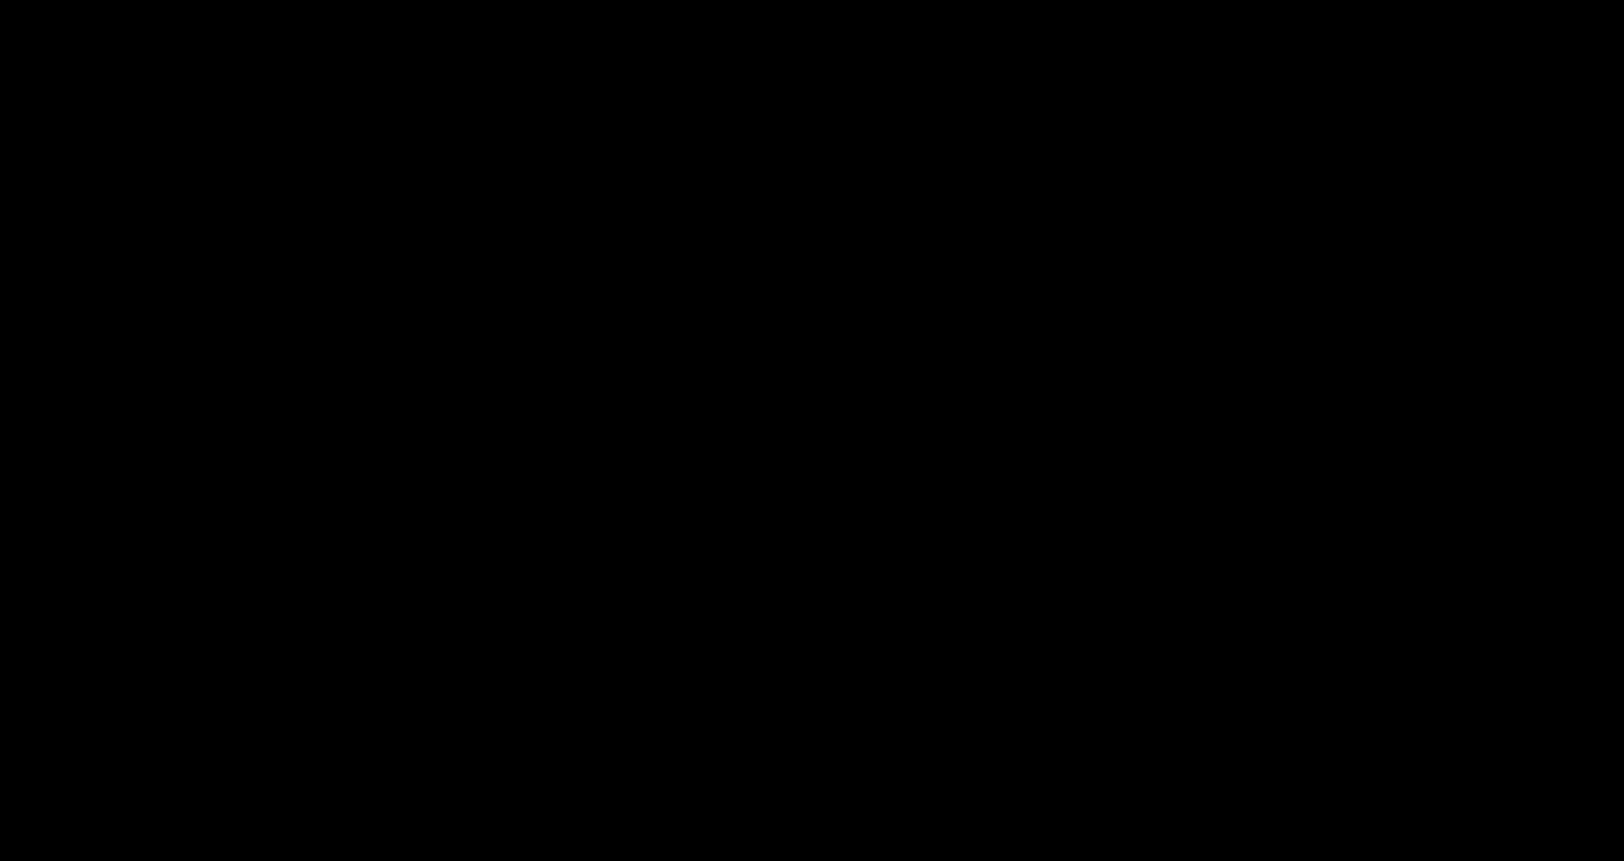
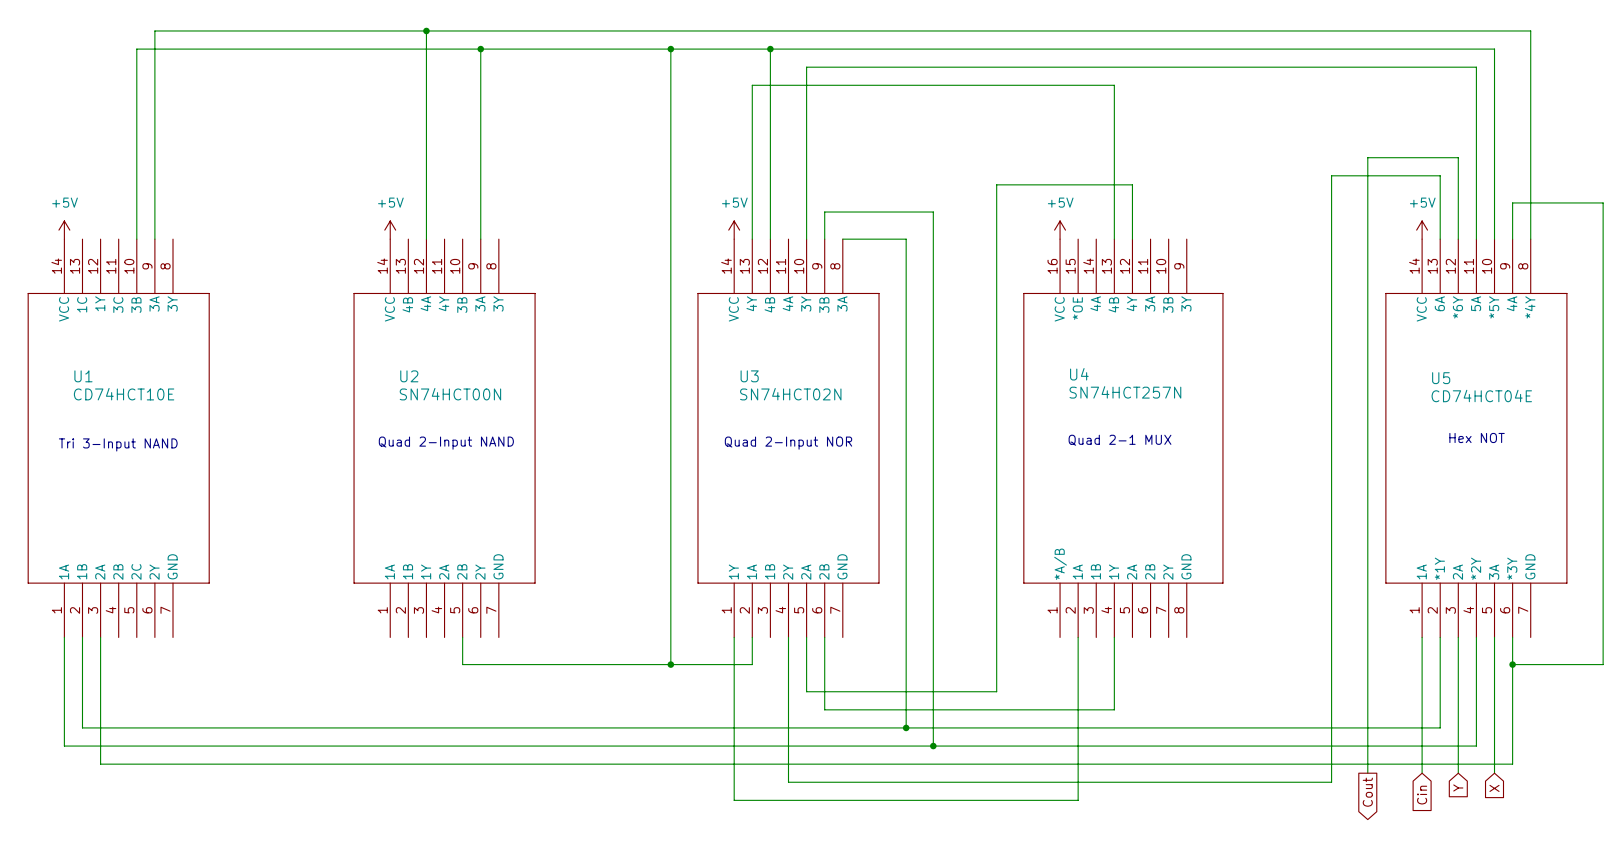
wire: none -> (426, 30) (426, 239)
junction: none -> (426, 30)
wire: none -> (480, 49) (480, 239)
junction: none -> (480, 49)
wire: none -> (670, 49) (670, 664)
junction: none -> (670, 49)
wire: none -> (770, 49) (770, 239)
junction: none -> (770, 49)
power symbol: none -> +5V (64, 230)
power symbol: none -> +5V (390, 230)
power symbol: none -> +5V (734, 230)
power symbol: none -> +5V (1060, 230)
power symbol: none -> +5V (1422, 230)
wire: none -> (136, 239) (136, 49) (1494, 49) (1494, 239)
wire: none -> (154, 239) (154, 30) (1530, 30) (1530, 239)
wire: none -> (752, 239) (752, 85) (1114, 85) (1114, 239)
wire: none -> (806, 239) (806, 67) (1476, 67) (1476, 239)
wire: none -> (824, 239) (824, 212) (933, 212) (933, 746)
wire: none -> (842, 239) (906, 239) (906, 727)
wire: none -> (1132, 239) (1132, 184) (996, 184) (996, 691) (806, 691) (806, 637)
wire: none -> (1440, 239) (1440, 175) (1331, 175) (1331, 782) (788, 782) (788, 637)
wire: none -> (1458, 239) (1458, 157) (1367, 157) (1367, 773)
wire: none -> (1512, 239) (1512, 202) (1603, 202) (1603, 664) (1512, 664)
text: none -> Hex NOT (1477, 437)
U1: none -> CD74HCT10E (118, 438)
U2: none -> SN74HCT00N (444, 438)
U3: none -> SN74HCT02N (788, 438)
U4: none -> SN74HCT257N (1123, 438)
U5: none -> CD74HCT04E (1476, 438)
text: none -> Quad 2-1 MUX (1119, 440)
text: none -> Quad 2-Input NAND (446, 443)
text: none -> Quad 2-Input NOR (788, 443)
text: none -> Tri 3-Input NAND (118, 444)
wire: none -> (64, 637) (64, 746) (1476, 746) (1476, 637)
wire: none -> (82, 637) (82, 727) (1440, 727) (1440, 637)
wire: none -> (100, 637) (100, 764) (1512, 764) (1512, 637)
wire: none -> (462, 637) (462, 664) (752, 664) (752, 637)
wire: none -> (734, 637) (734, 800) (1078, 800) (1078, 637)
wire: none -> (824, 637) (824, 709) (1114, 709) (1114, 637)
wire: none -> (1422, 637) (1422, 773)
wire: none -> (1458, 637) (1458, 773)
wire: none -> (1494, 637) (1494, 773)
junction: none -> (670, 664)
junction: none -> (1512, 664)
junction: none -> (906, 727)
junction: none -> (933, 746)
global label: none -> Y (1458, 787)
global label: none -> X (1494, 788)
global label: none -> Cout (1367, 792)
global label: none -> Cin (1422, 795)

